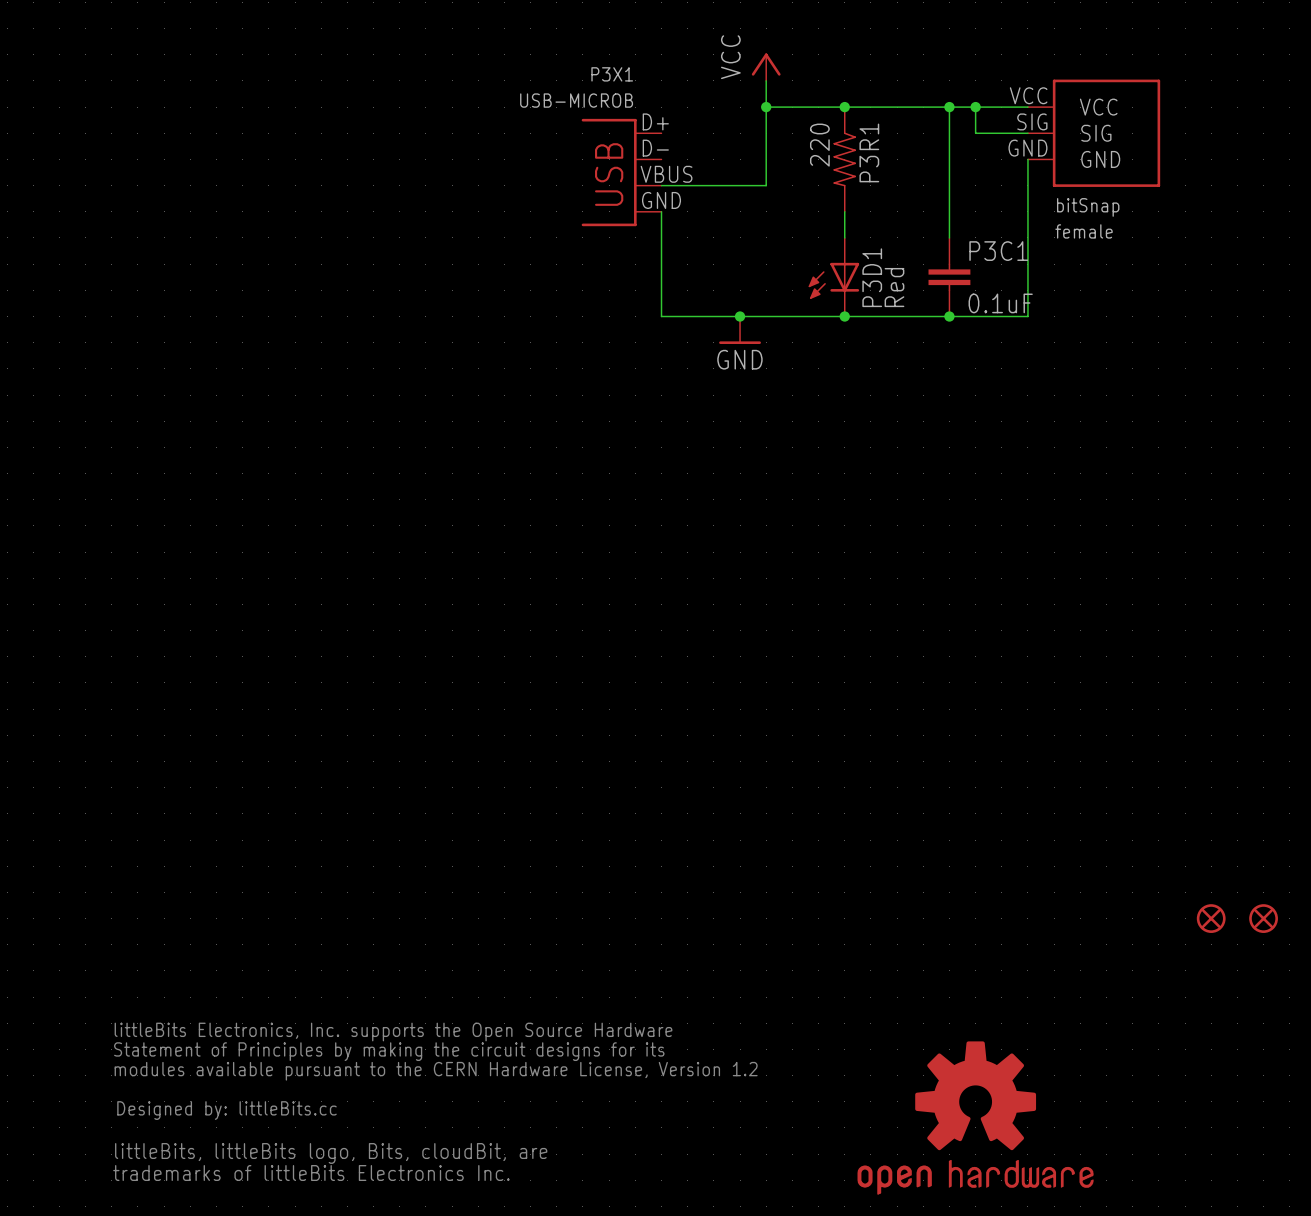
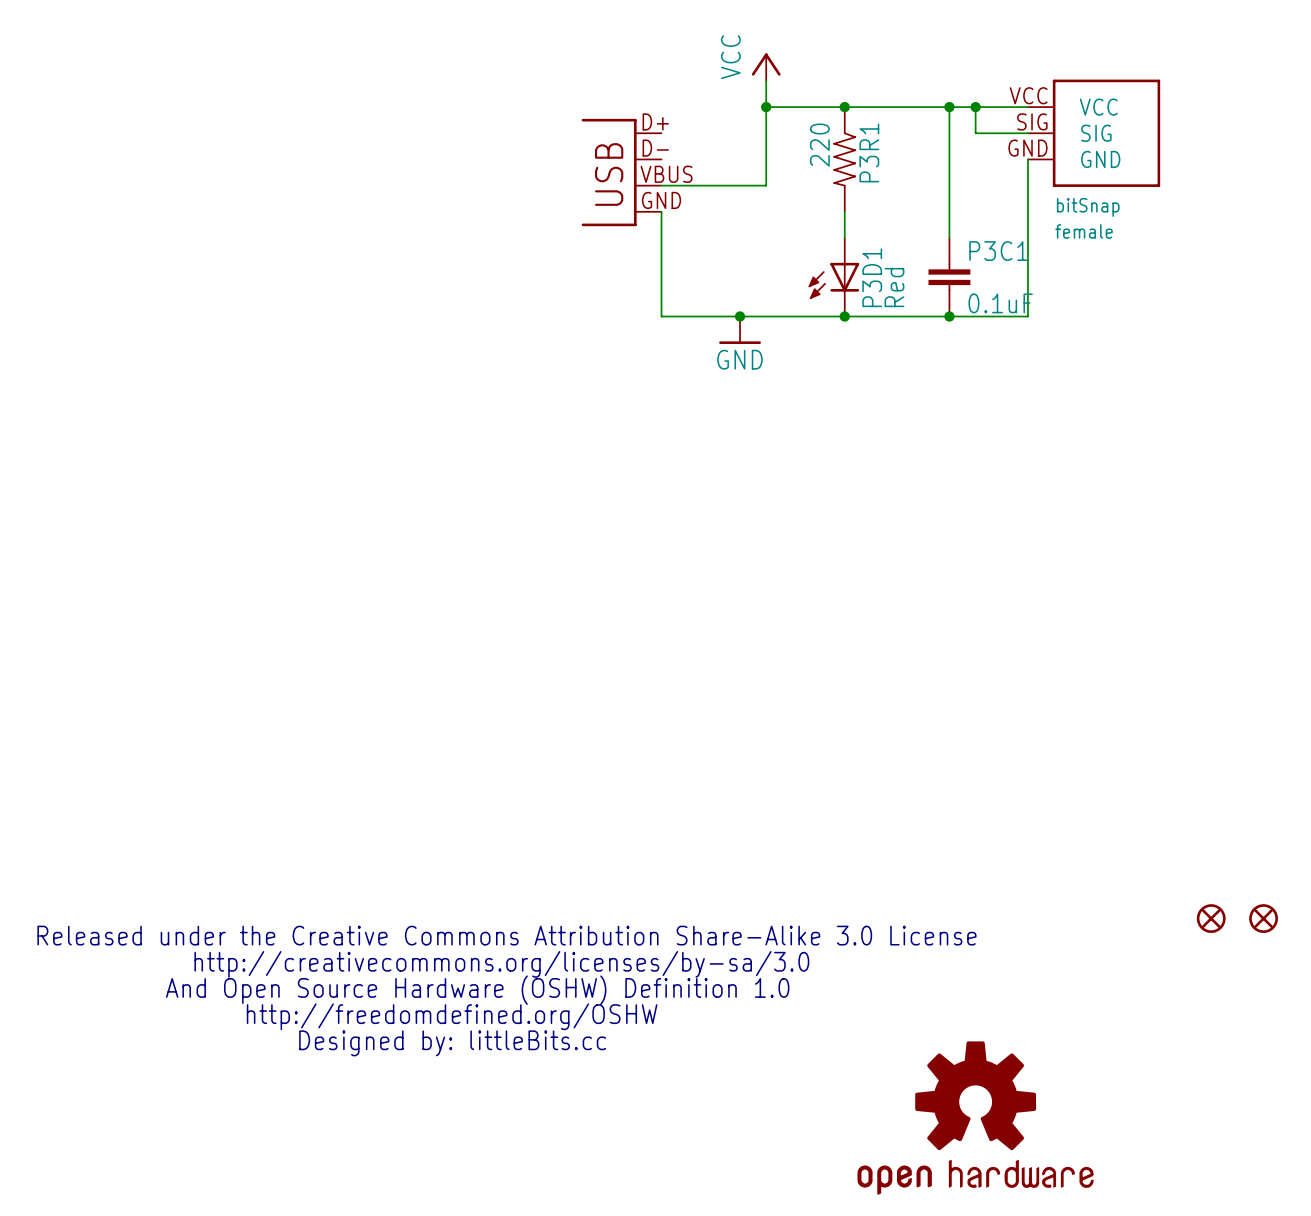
P3X1 name: P3X1 (612, 74) -> none
P3X1 value: USB-MICROB (576, 100) -> none
part: none -> (506, 990)
part: (435, 1101) -> none

